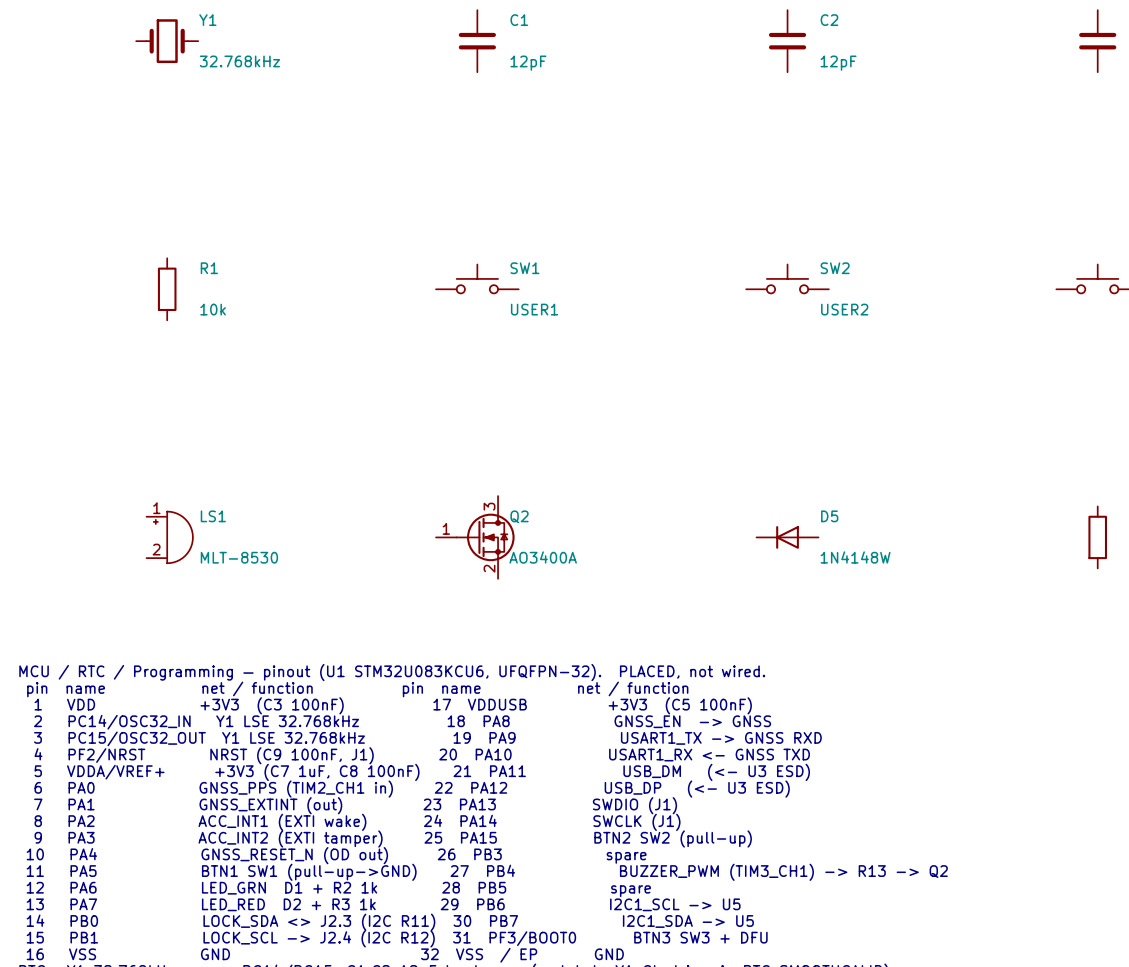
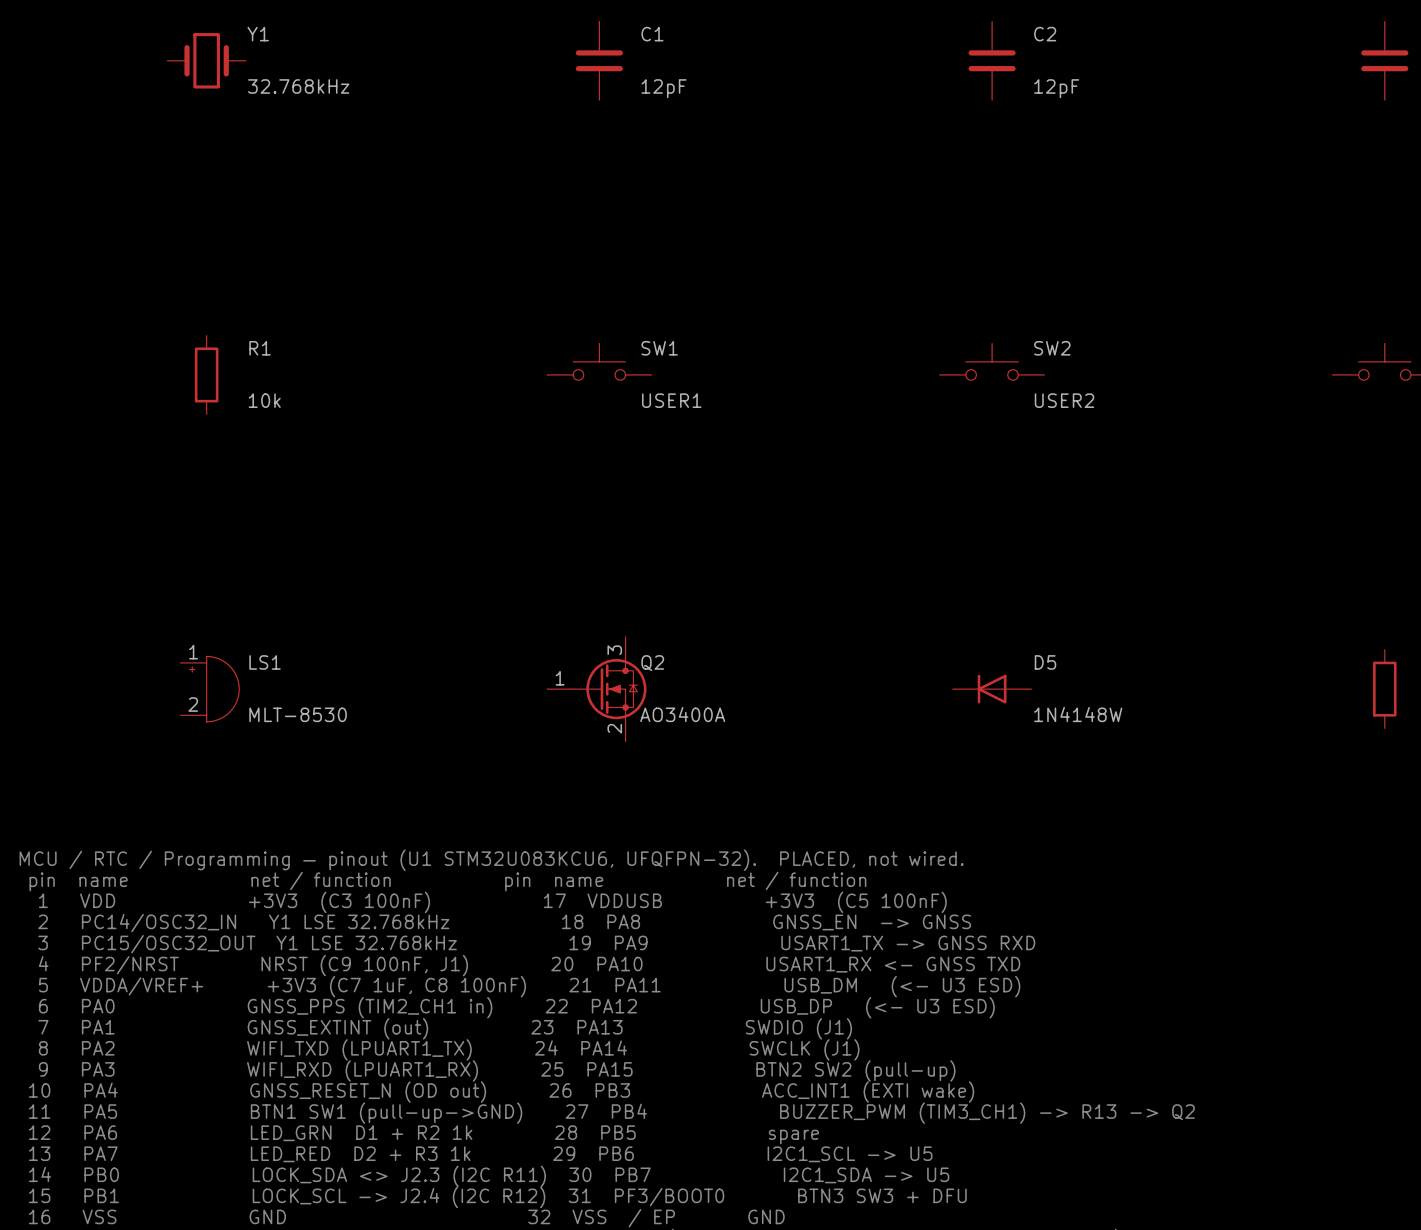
text: 8 PA2 ACC_INT1 (EXTI wake) 24 PA14 SWCLK (J1) (357, 822) -> 8 PA2 WIFI_TXD (LPUART1_TX) 24 PA14 SWCLK (J1) (449, 1049)
text: 9 PA3 ACC_INT2 (EXTI tamper) 25 PA15 BTN2 SW2 (pull-up) (393, 839) -> 9 PA3 WIFI_RXD (LPUART1_RX) 25 PA15 BTN2 SW2 (pull-up) (497, 1070)
text: 10 PA4 GNSS_RESET_N (OD out) 26 PB3 spare (336, 855) -> 10 PA4 GNSS_RESET_N (OD out) 26 PB3 ACC_INT1 (EXTI wake) (501, 1092)

